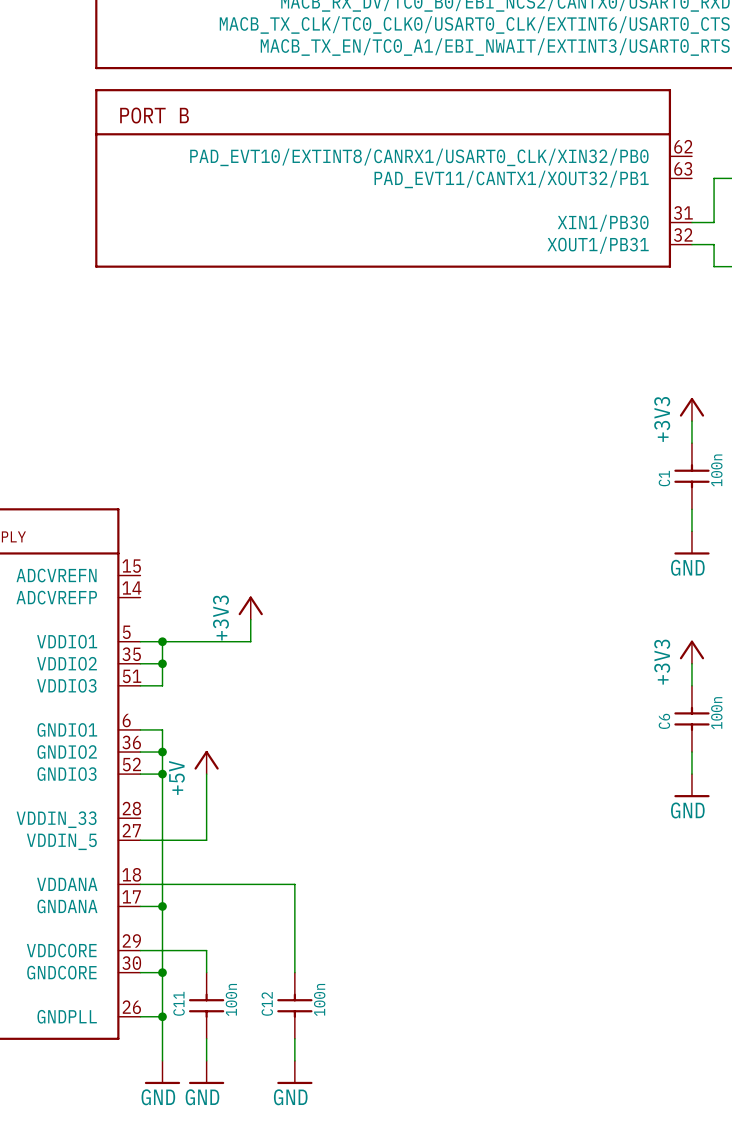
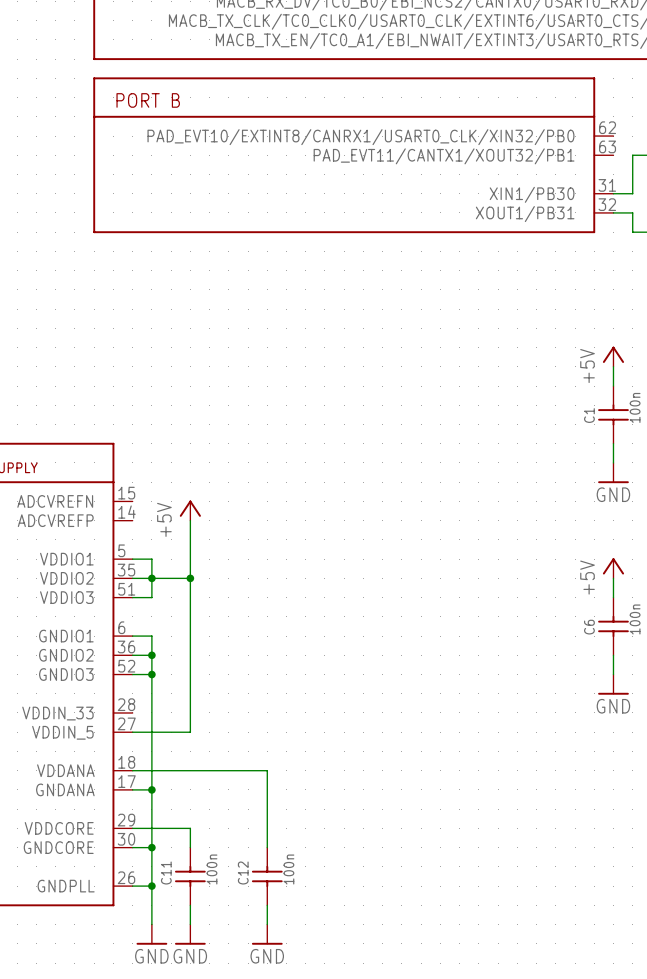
power symbol: +3V3 (691, 409) -> +5V (613, 356)
wire: none -> (190, 520) (190, 674)
power symbol: +3V3 (250, 608) -> none
wire: (250, 619) (250, 641) (162, 641) -> none
junction position: (162, 641) -> (190, 578)
power symbol: +3V3 (691, 652) -> +5V (613, 568)
wire: none -> (151, 578) (190, 578)
power symbol position: +5V (206, 762) -> +5V (190, 510)

